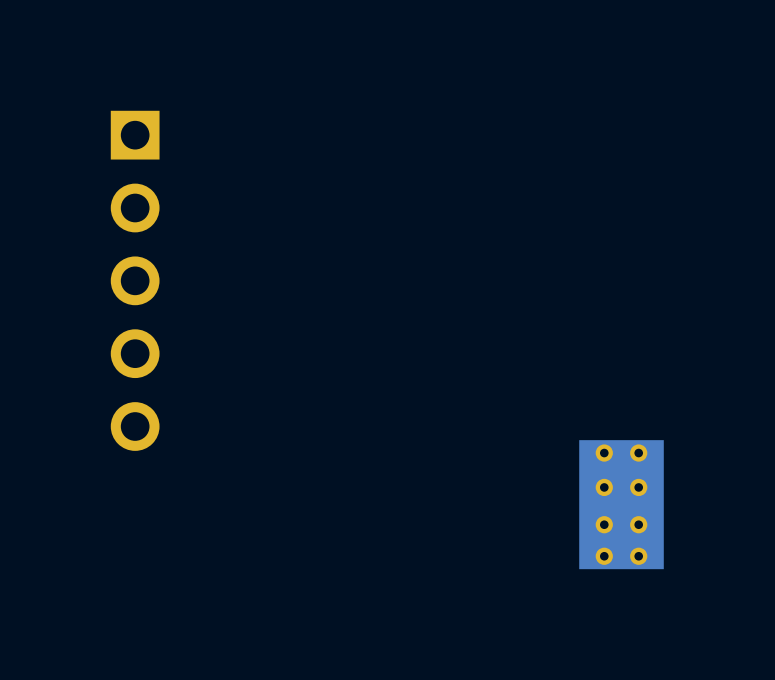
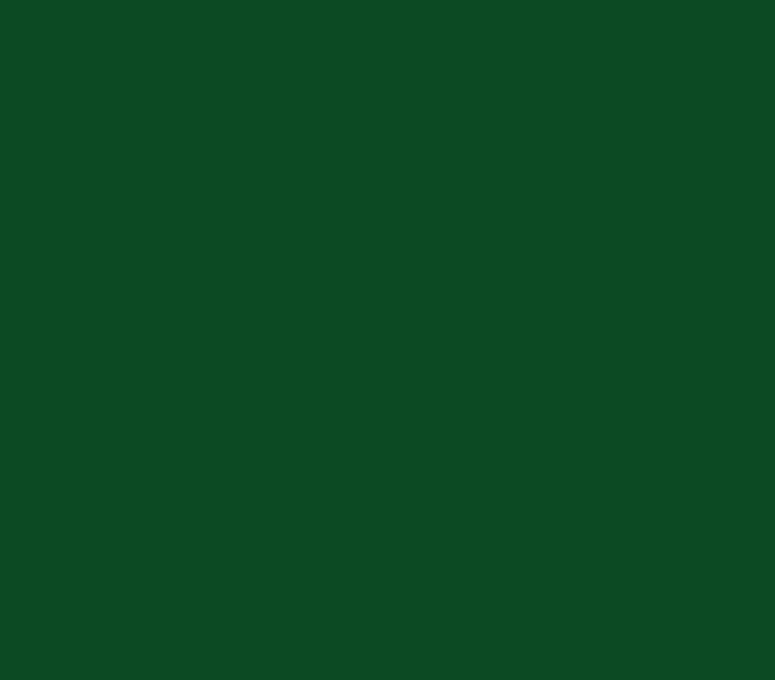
part: (135, 280) -> none
part: (621, 504) -> none

